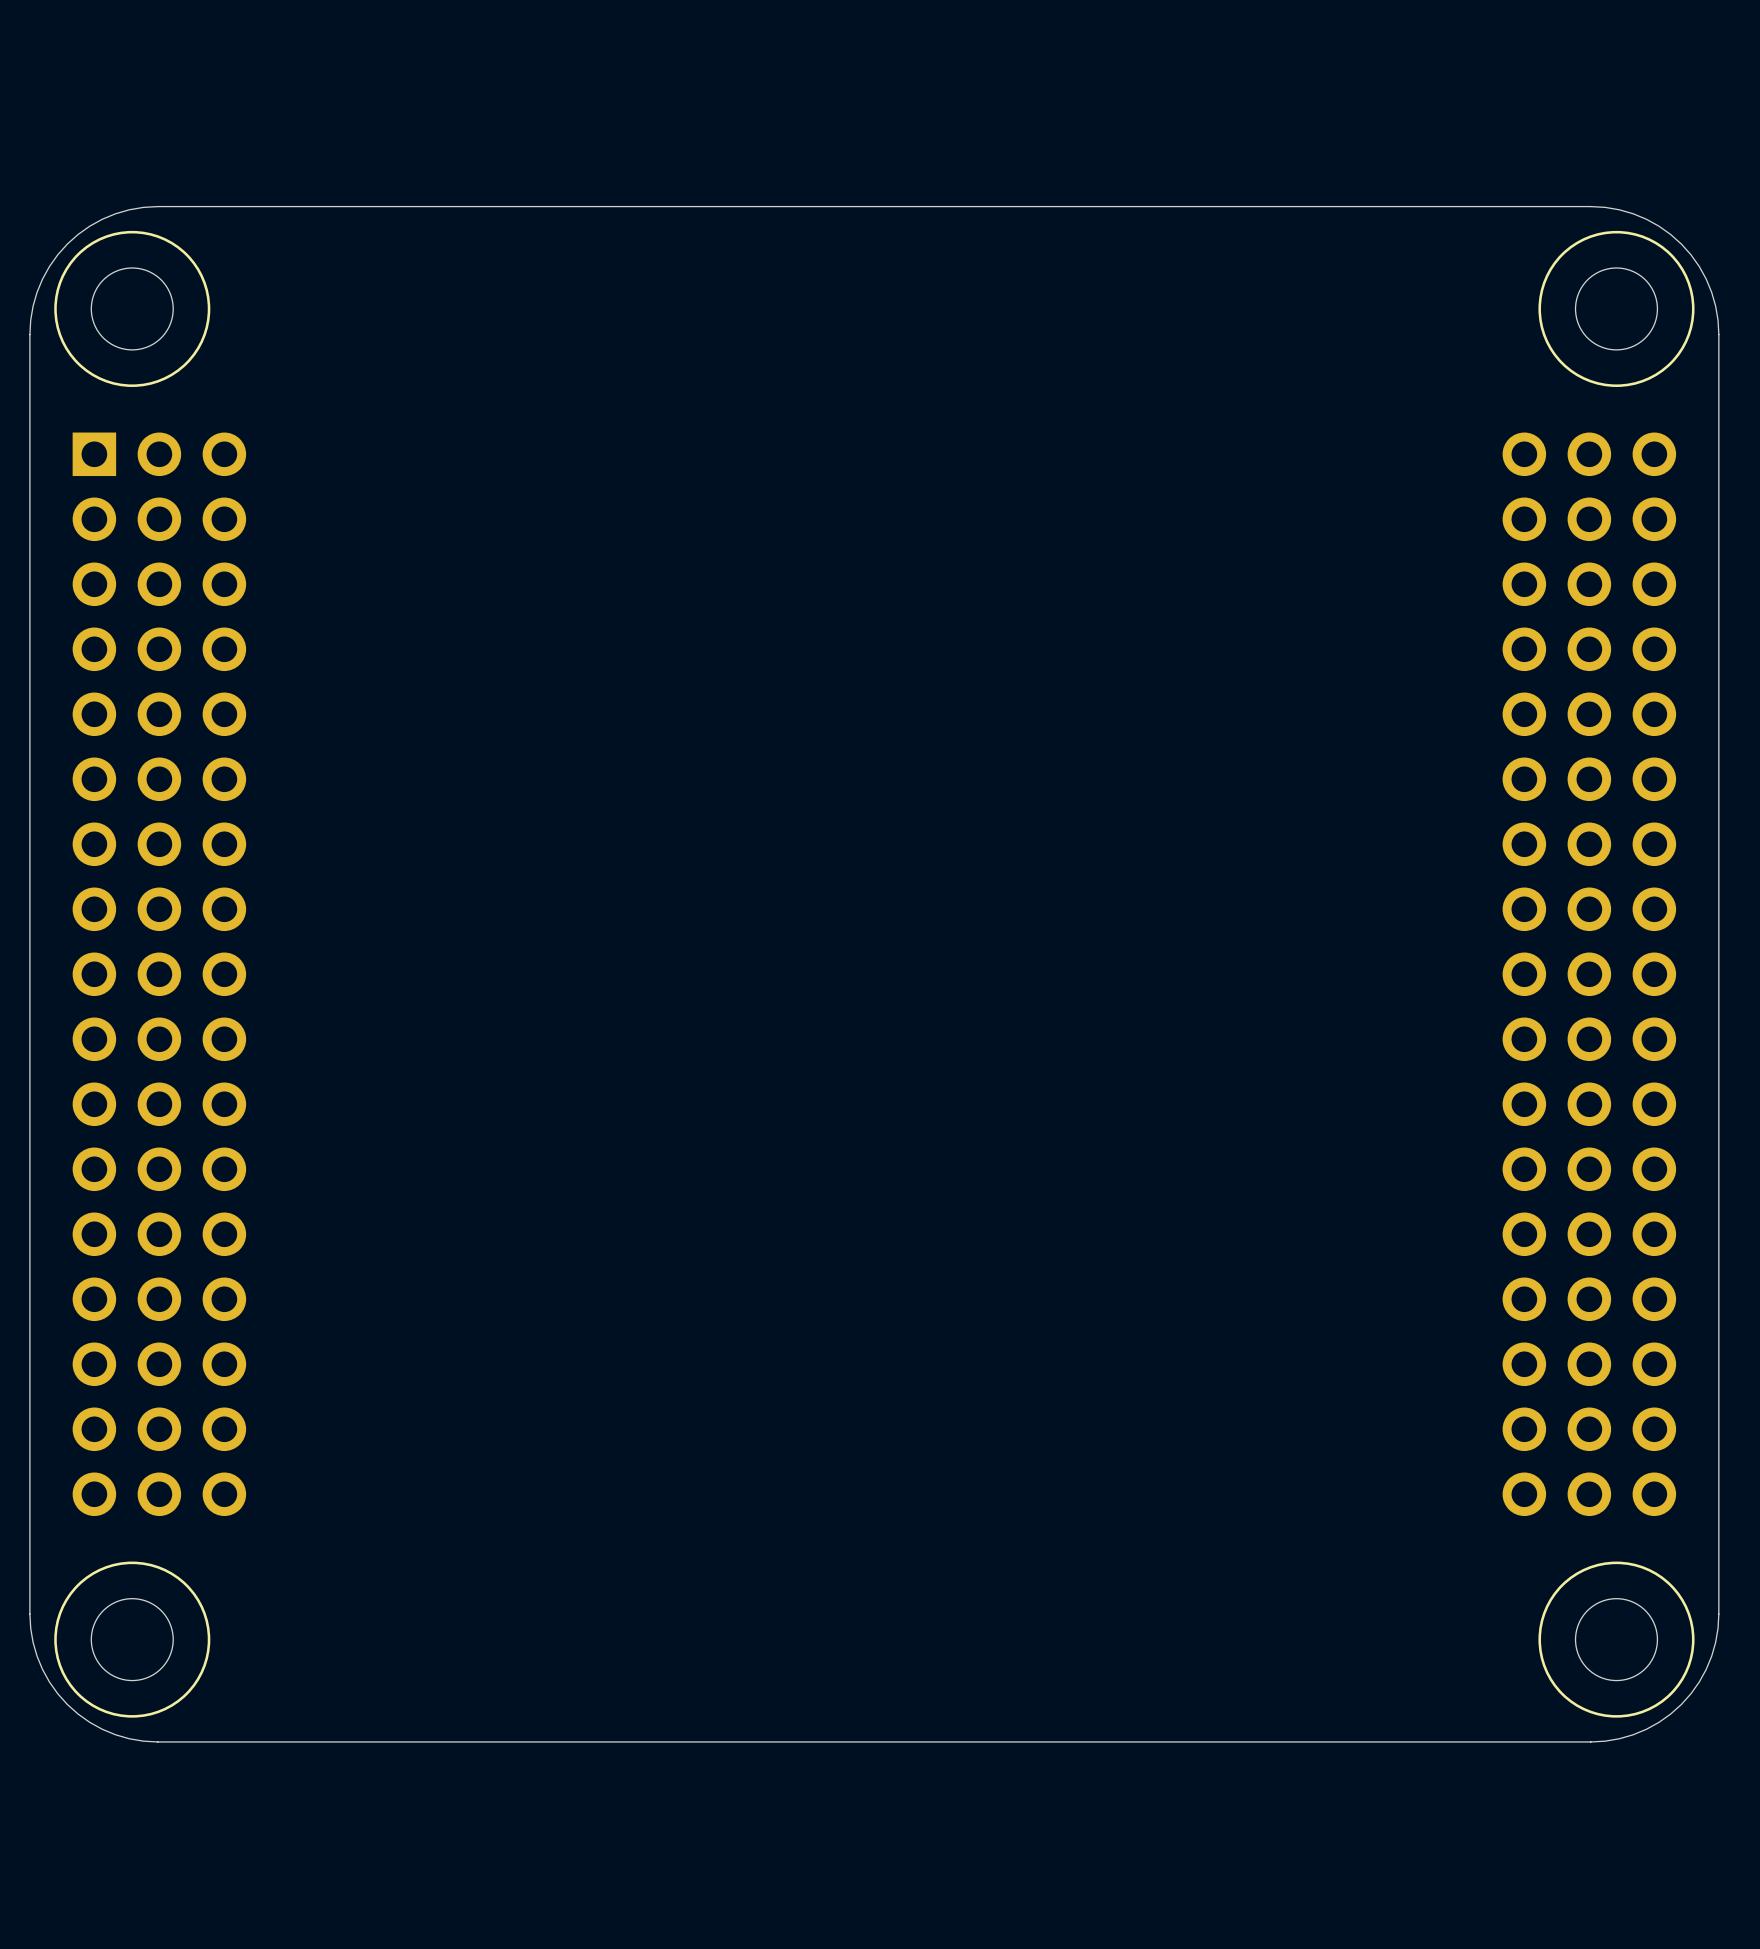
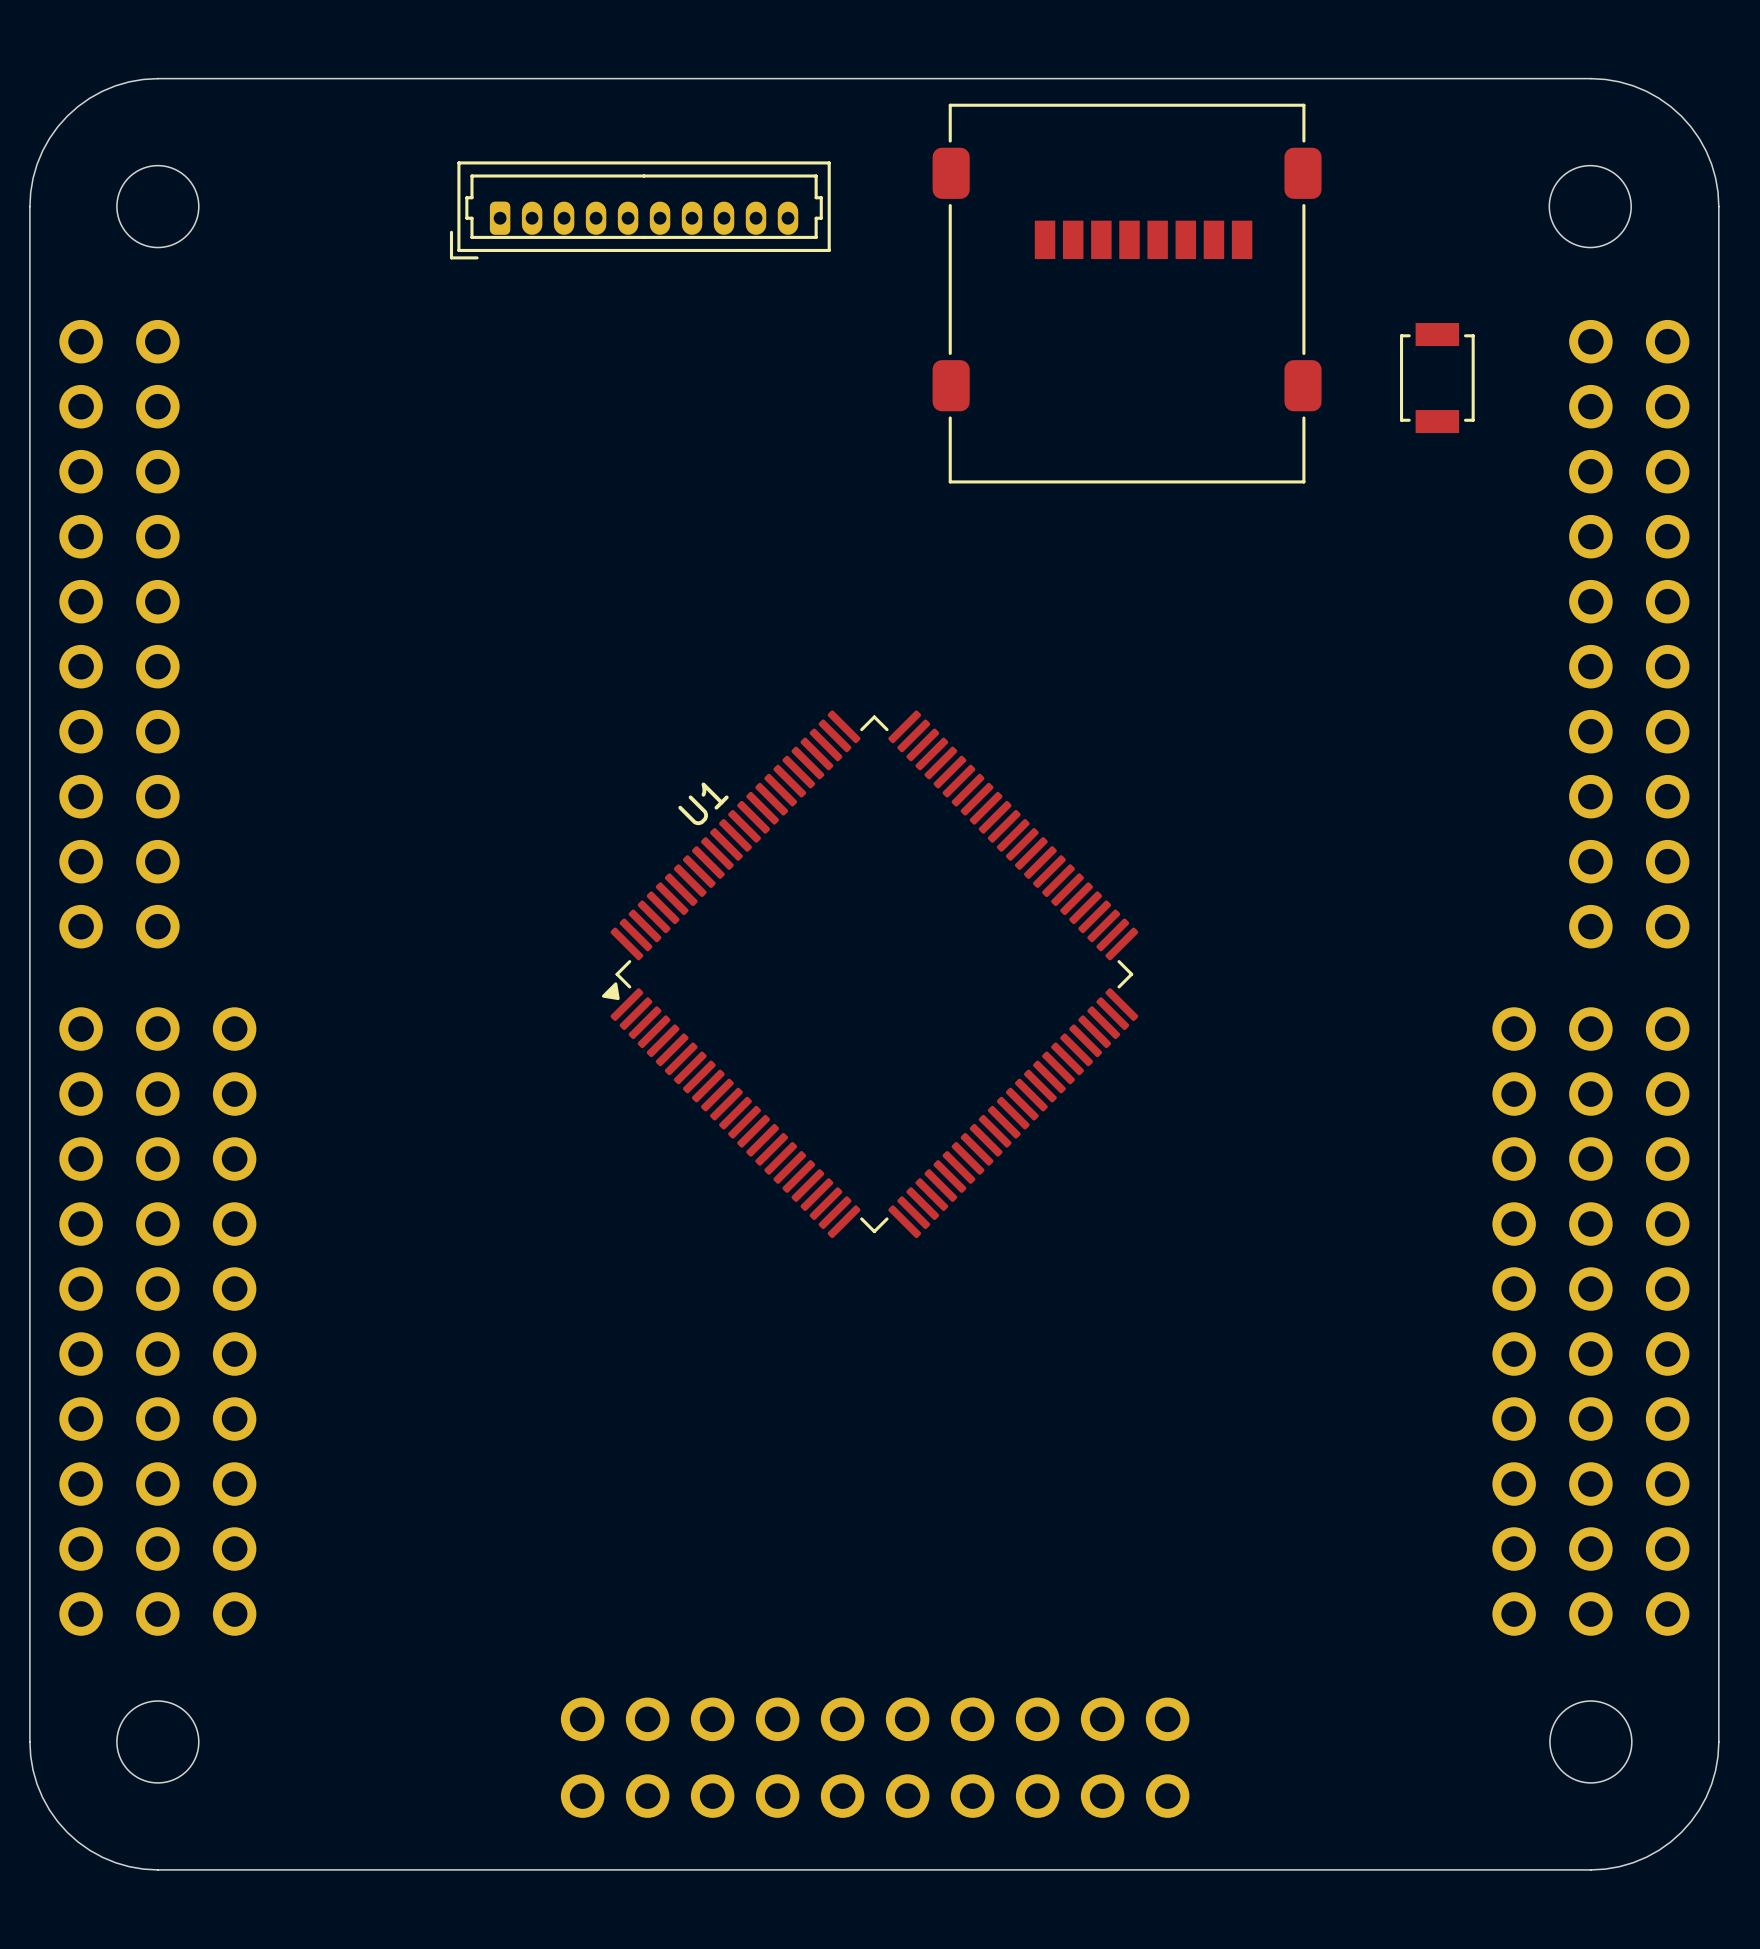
part footprint: [29, 205, 1720, 1743] -> [29, 77, 1720, 1871]
part: none -> (640, 210)
part: none -> (1127, 293)
part: none -> (1437, 378)
U1: none -> (870, 974)

